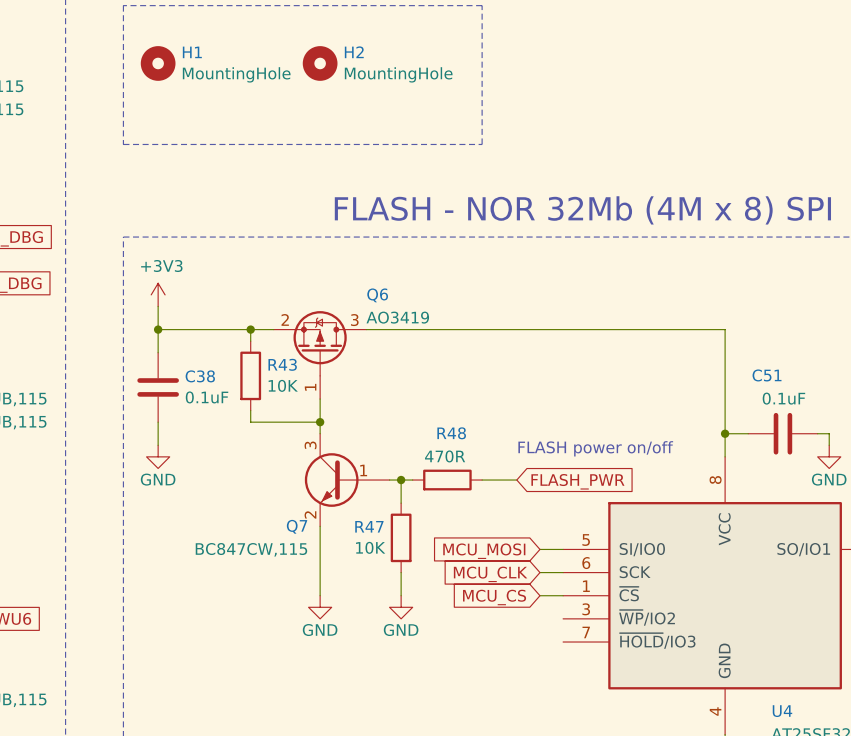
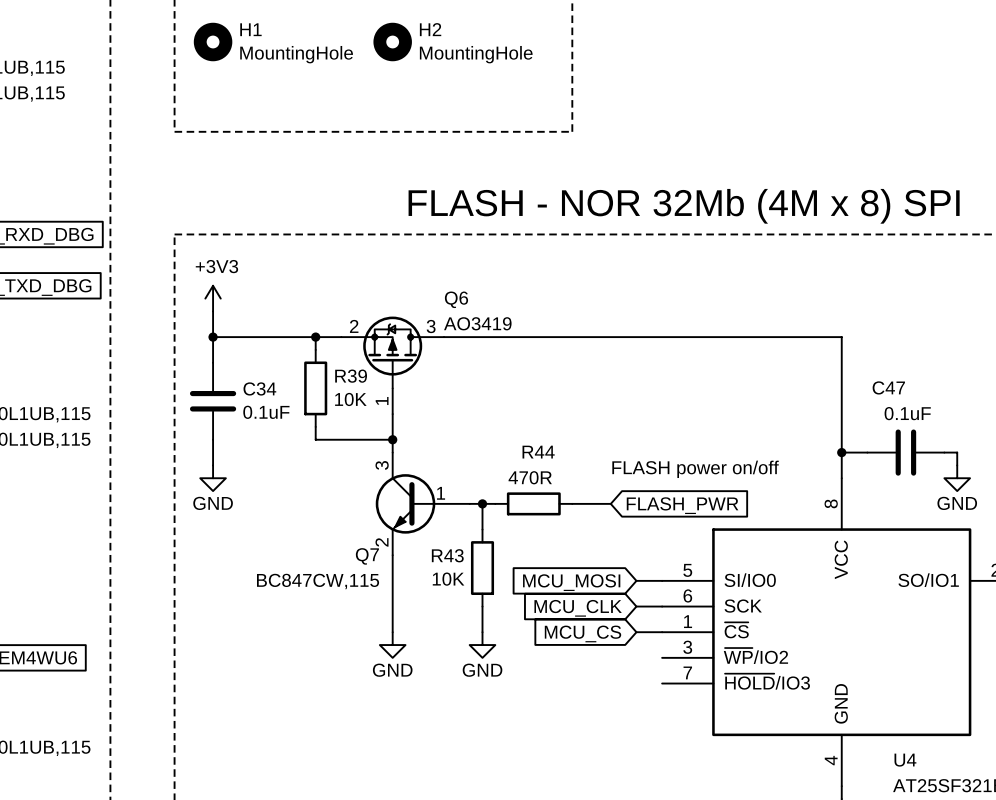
R43 name: R43 (282, 364) -> R39 (351, 376)
C51 name: C51 (767, 375) -> C47 (888, 387)
C38 name: C38 (200, 376) -> C34 (259, 388)
R48 name: R48 (451, 433) -> R44 (538, 452)
R47 name: R47 (369, 526) -> R43 (447, 555)

